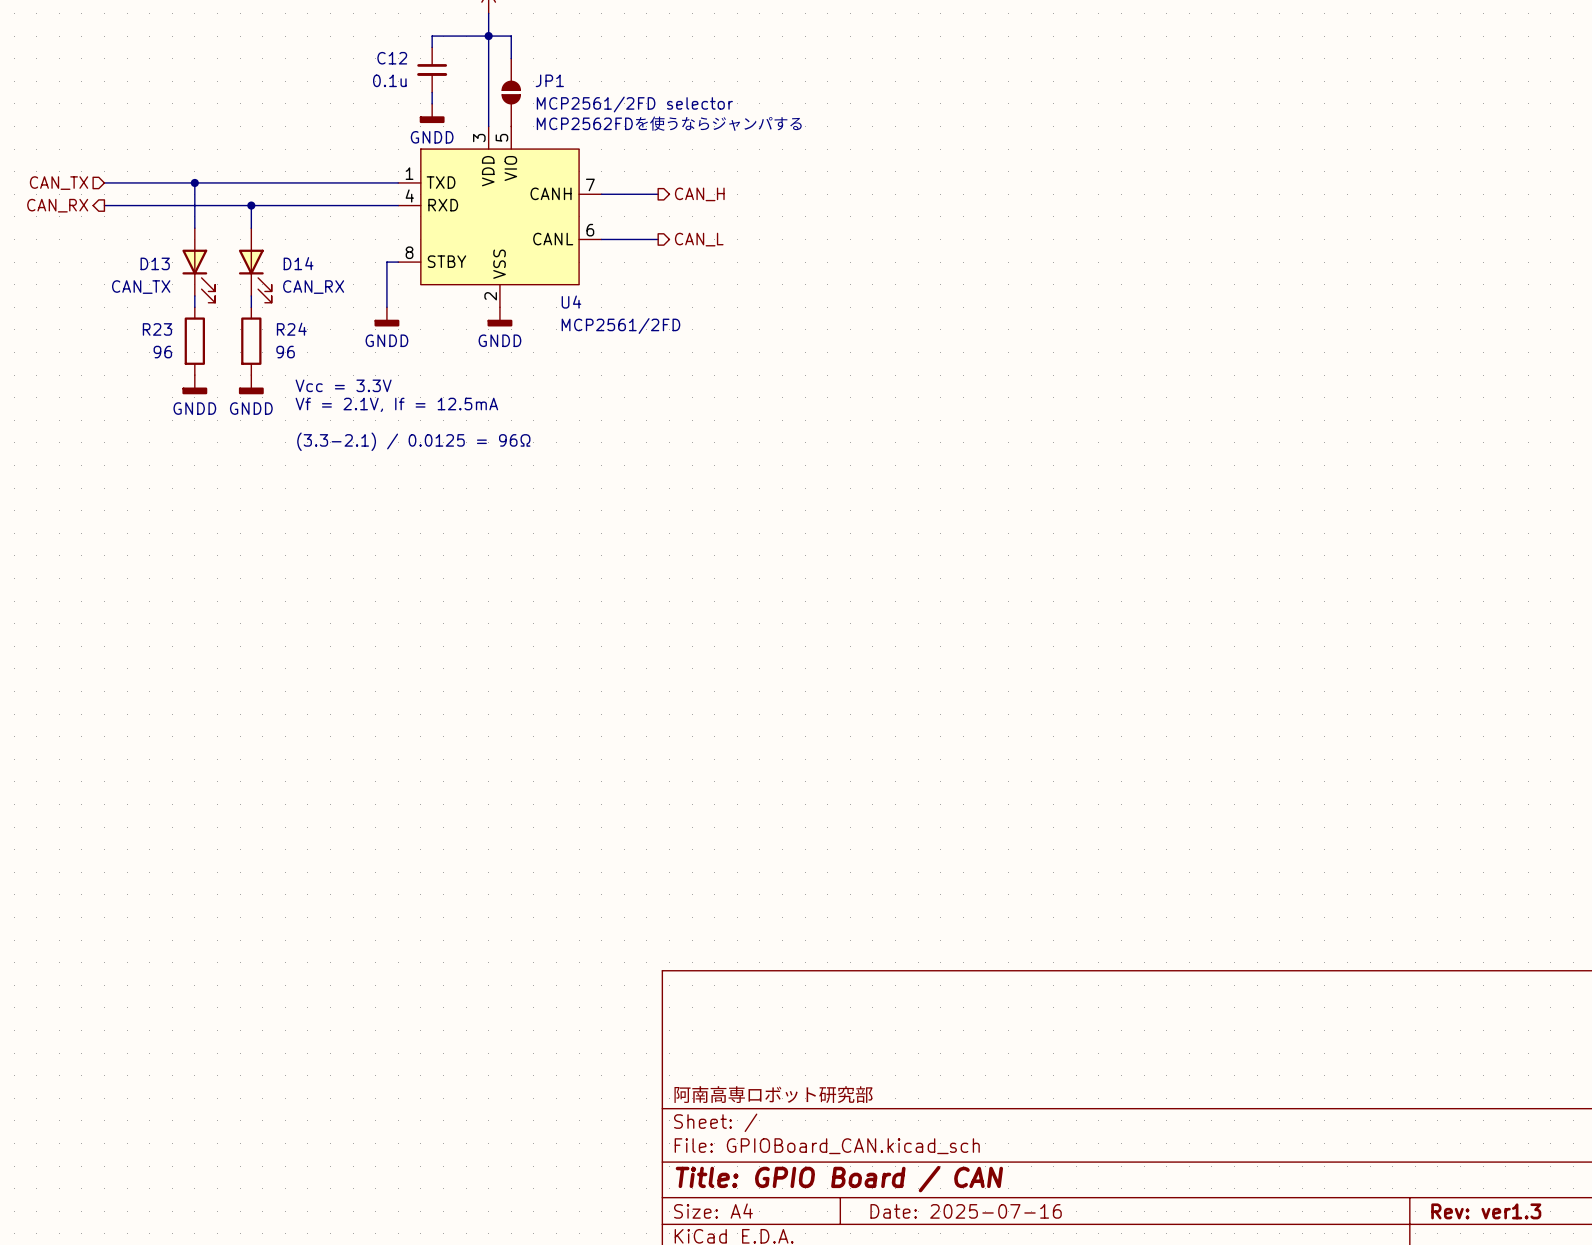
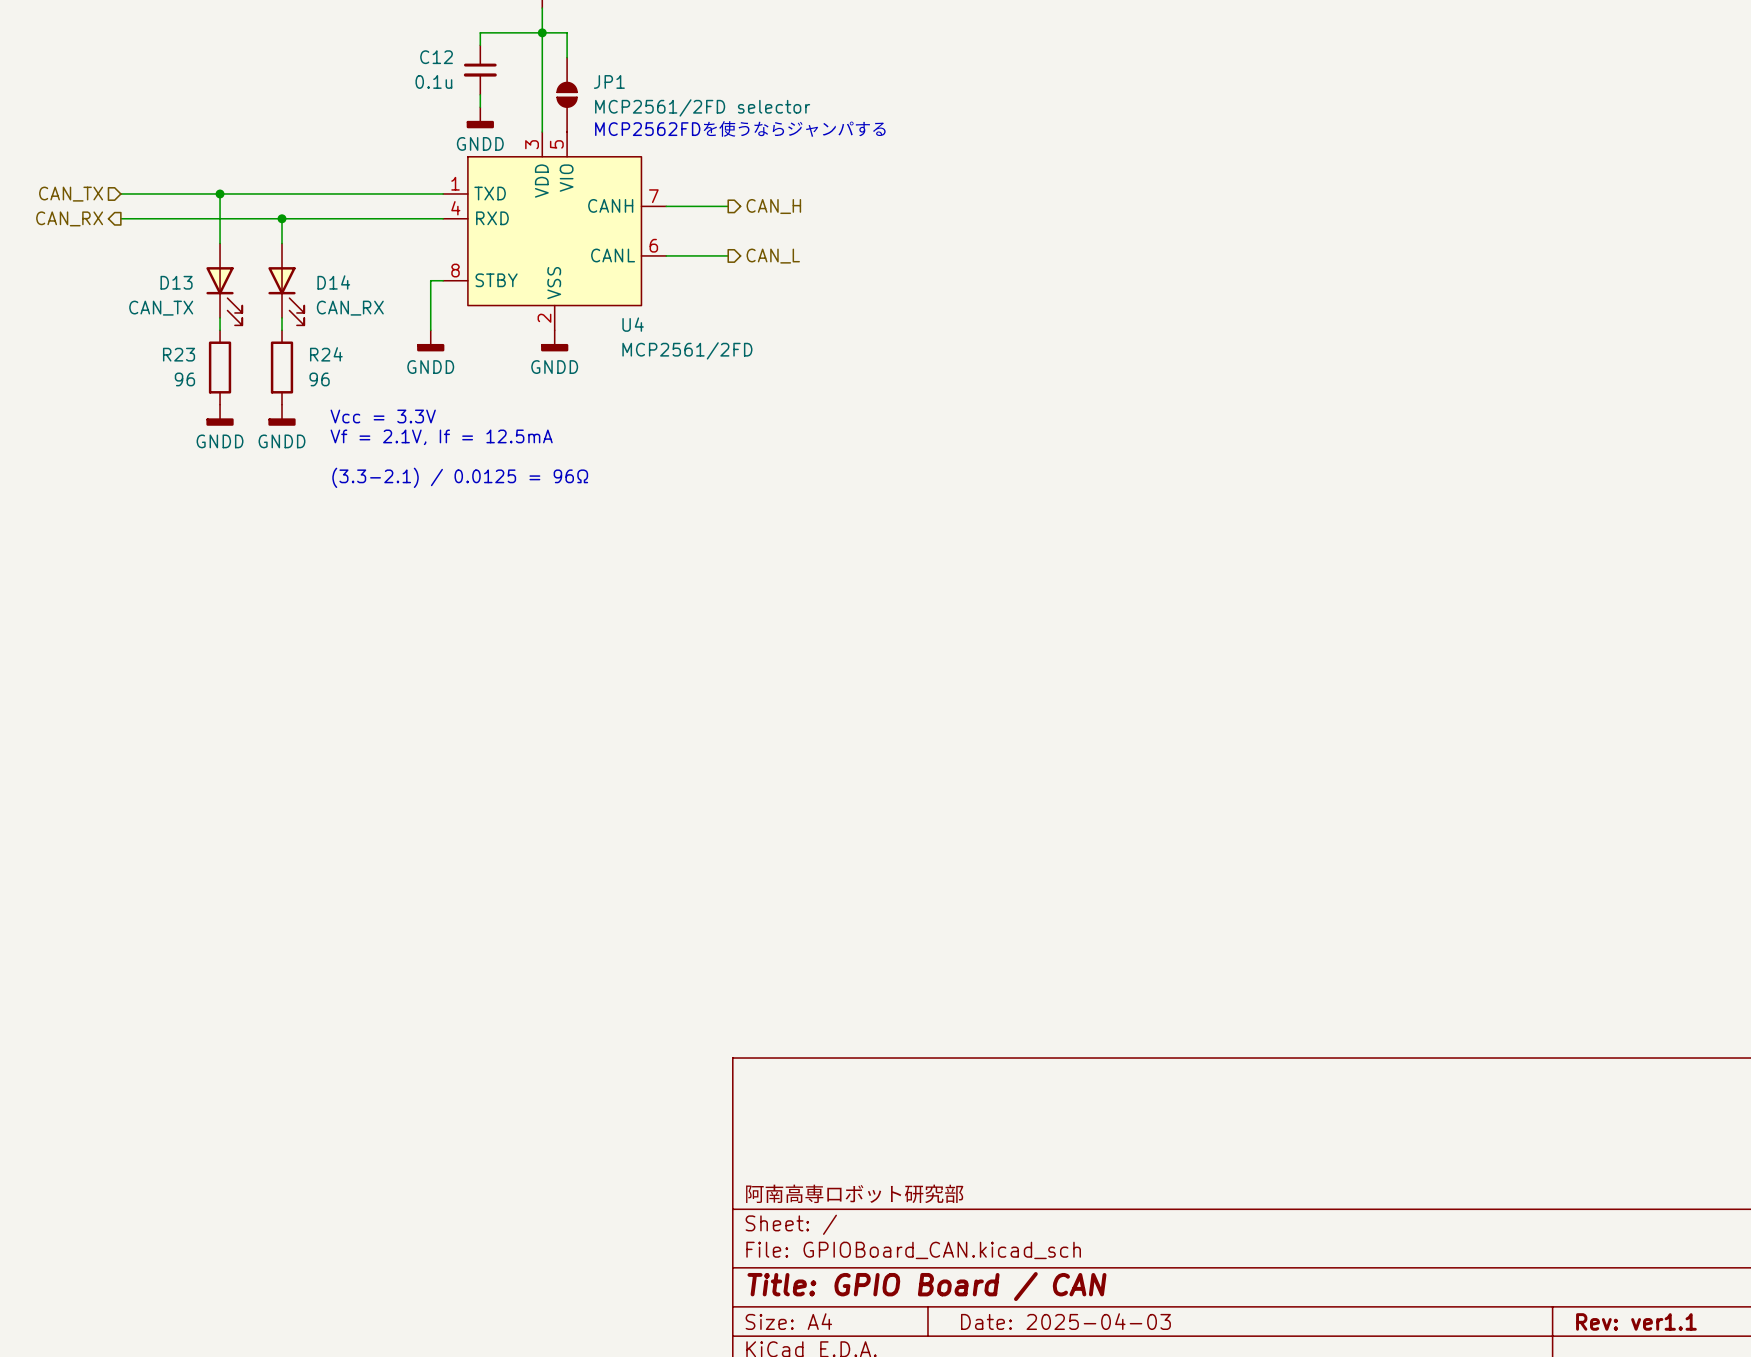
title block: Date: 2025-07-16 (966, 1211) -> Date: 2025-04-03 (1065, 1321)
title block: Rev: ver1.3 (1486, 1211) -> Rev: ver1.1 (1636, 1321)

